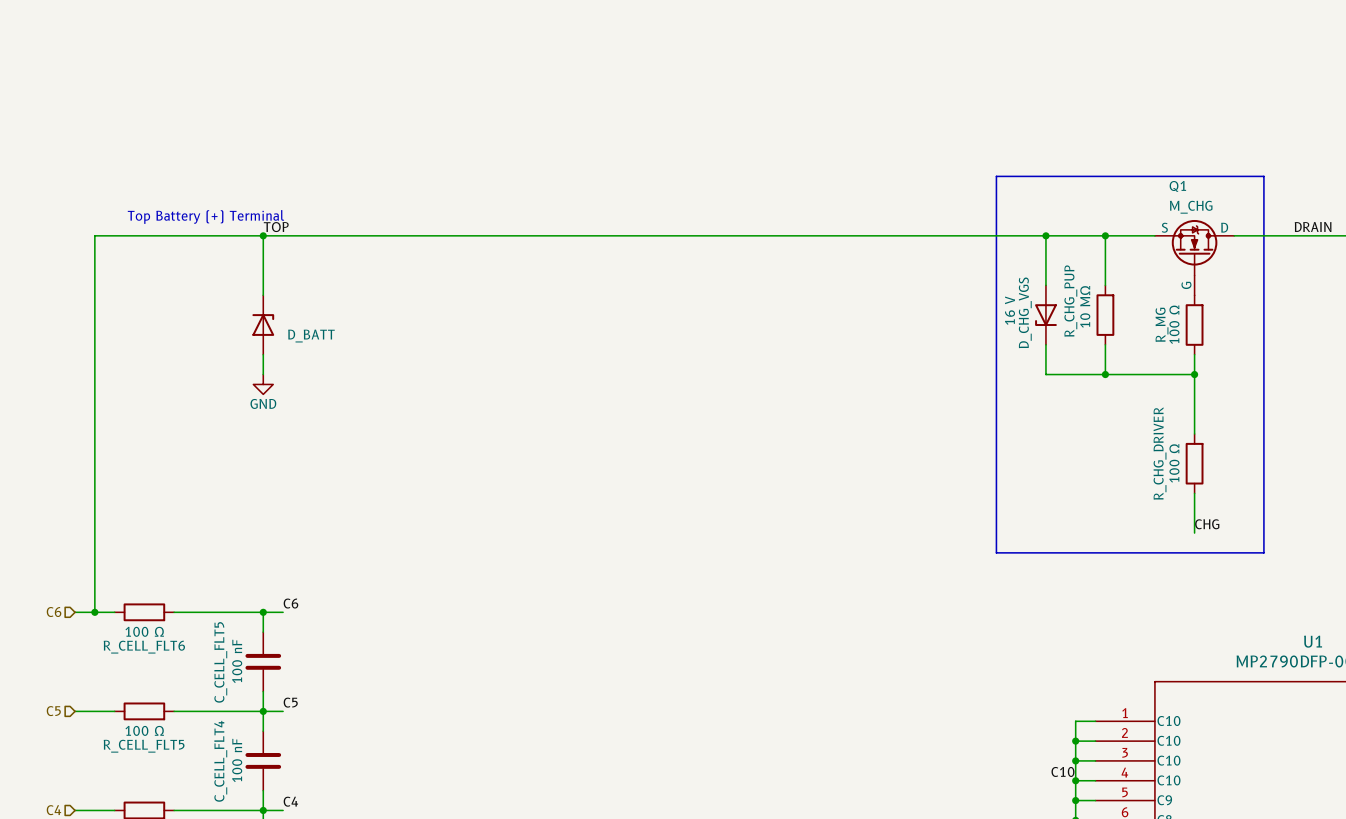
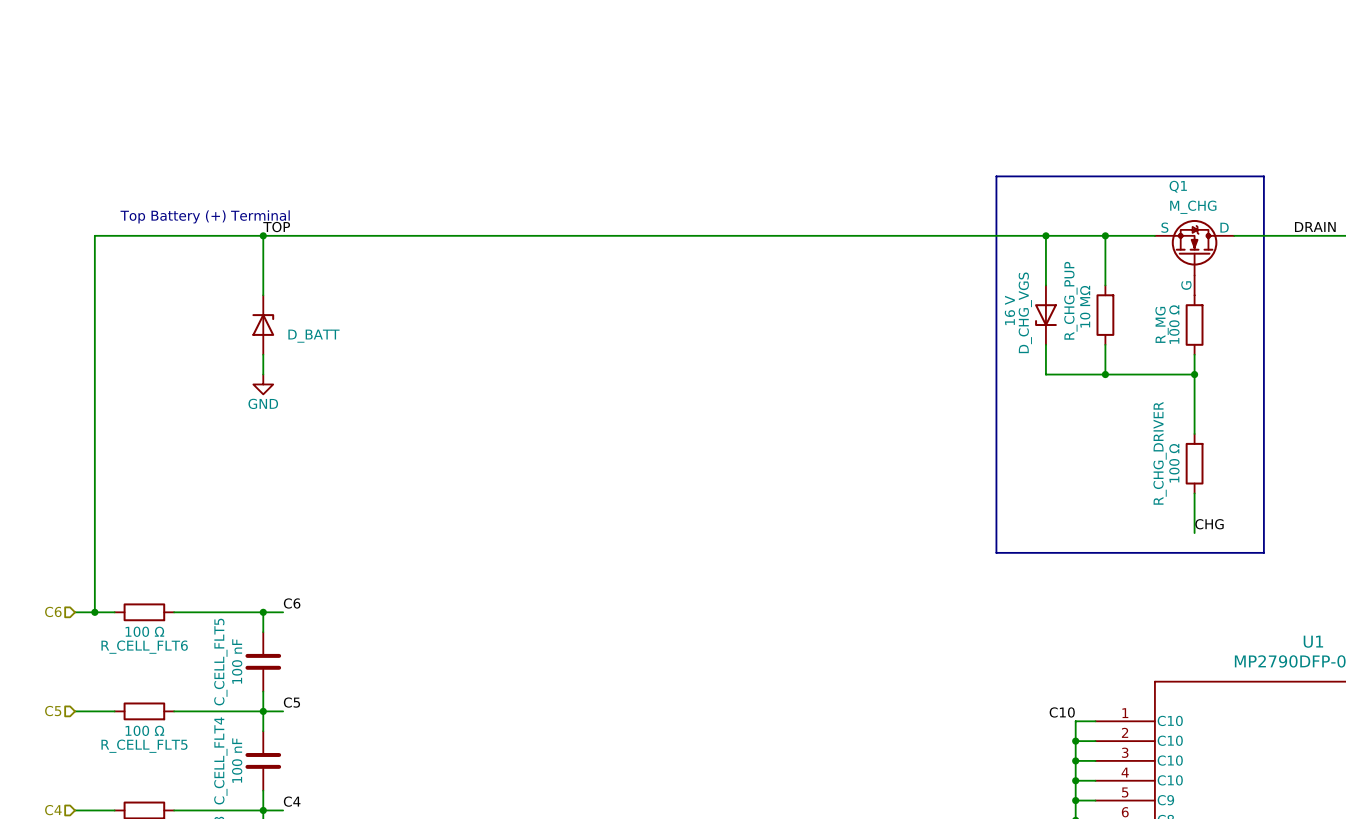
label position: C10 (1062, 771) -> C10 (1062, 712)

